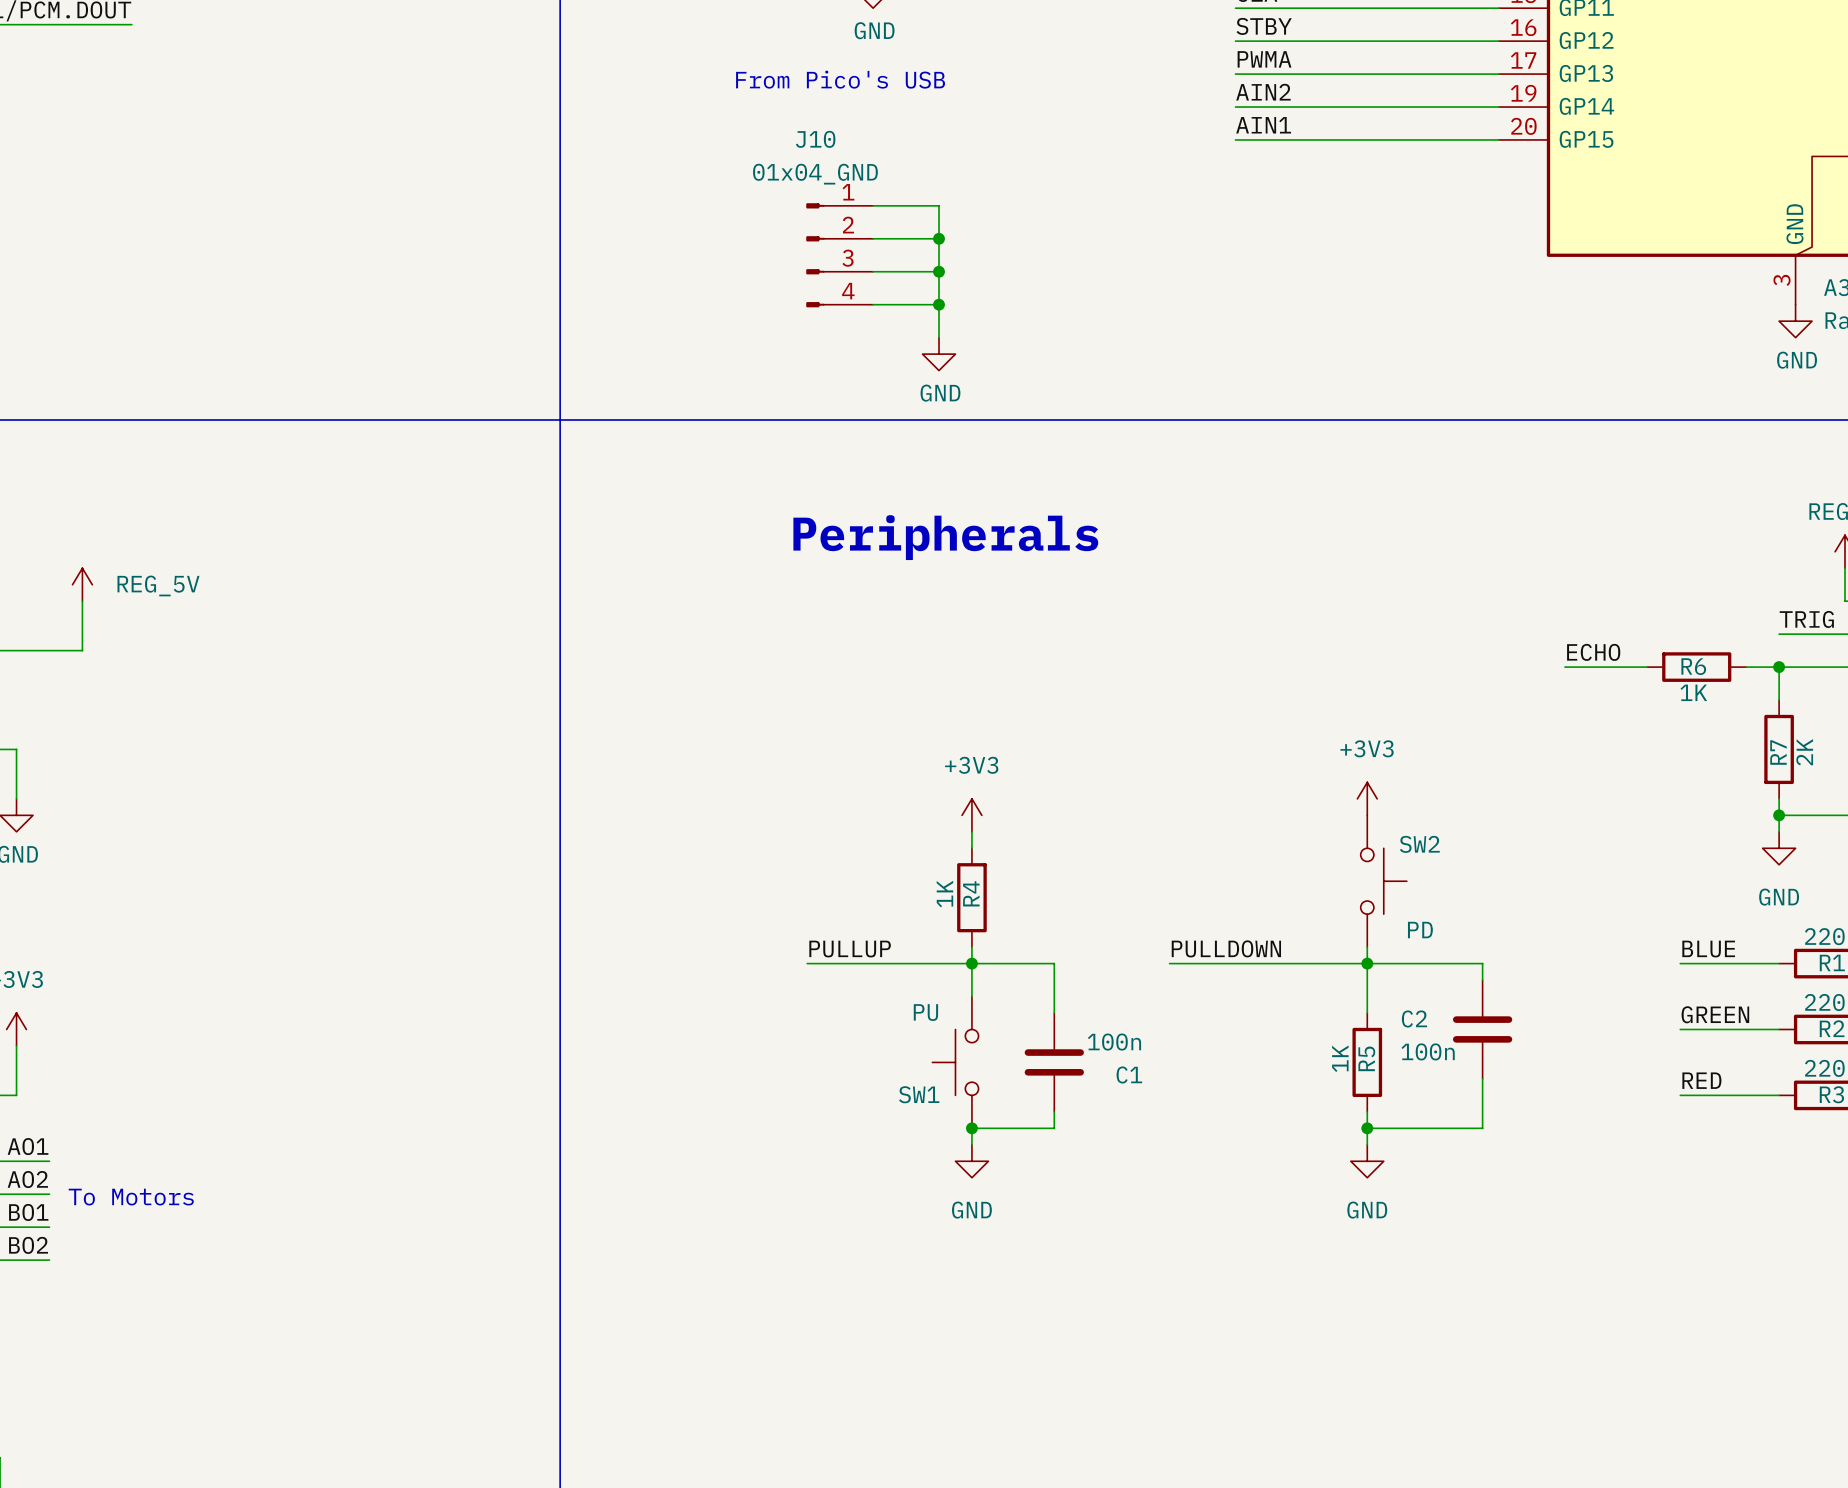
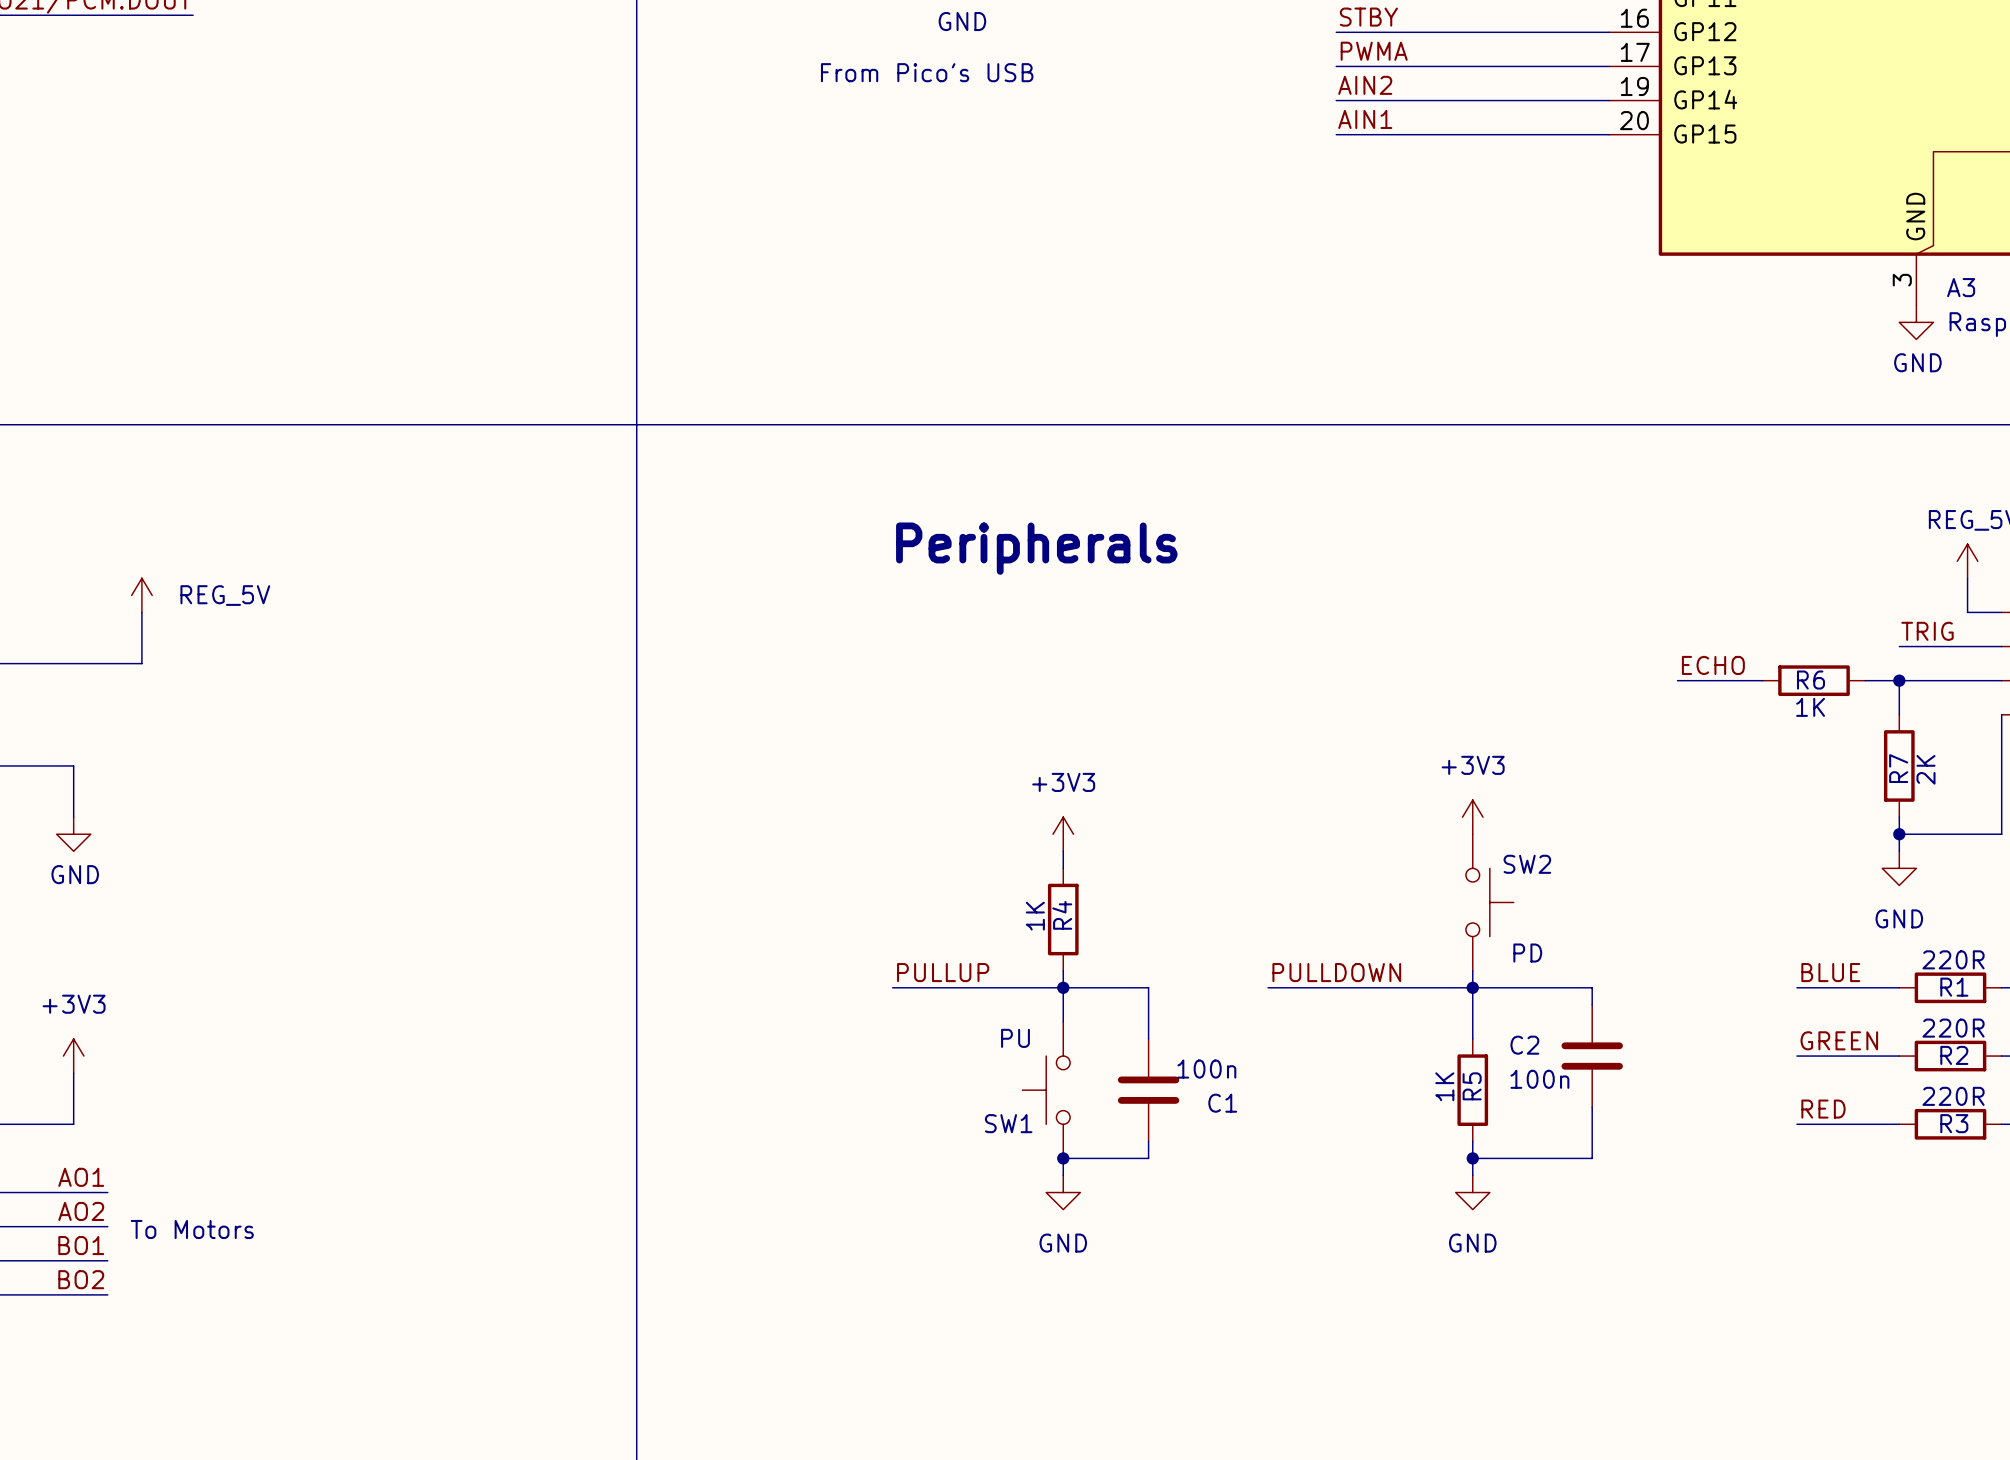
wire: (873, 205) (939, 205) (939, 337) -> none
wire: (873, 238) (939, 238) -> none
junction: (939, 238) -> none
J10: 01x04_GND (839, 255) -> none
wire: (873, 271) (939, 271) -> none
junction: (939, 271) -> none
wire: (873, 304) (939, 304) -> none
junction: (939, 304) -> none
power symbol: GND (939, 354) -> none

